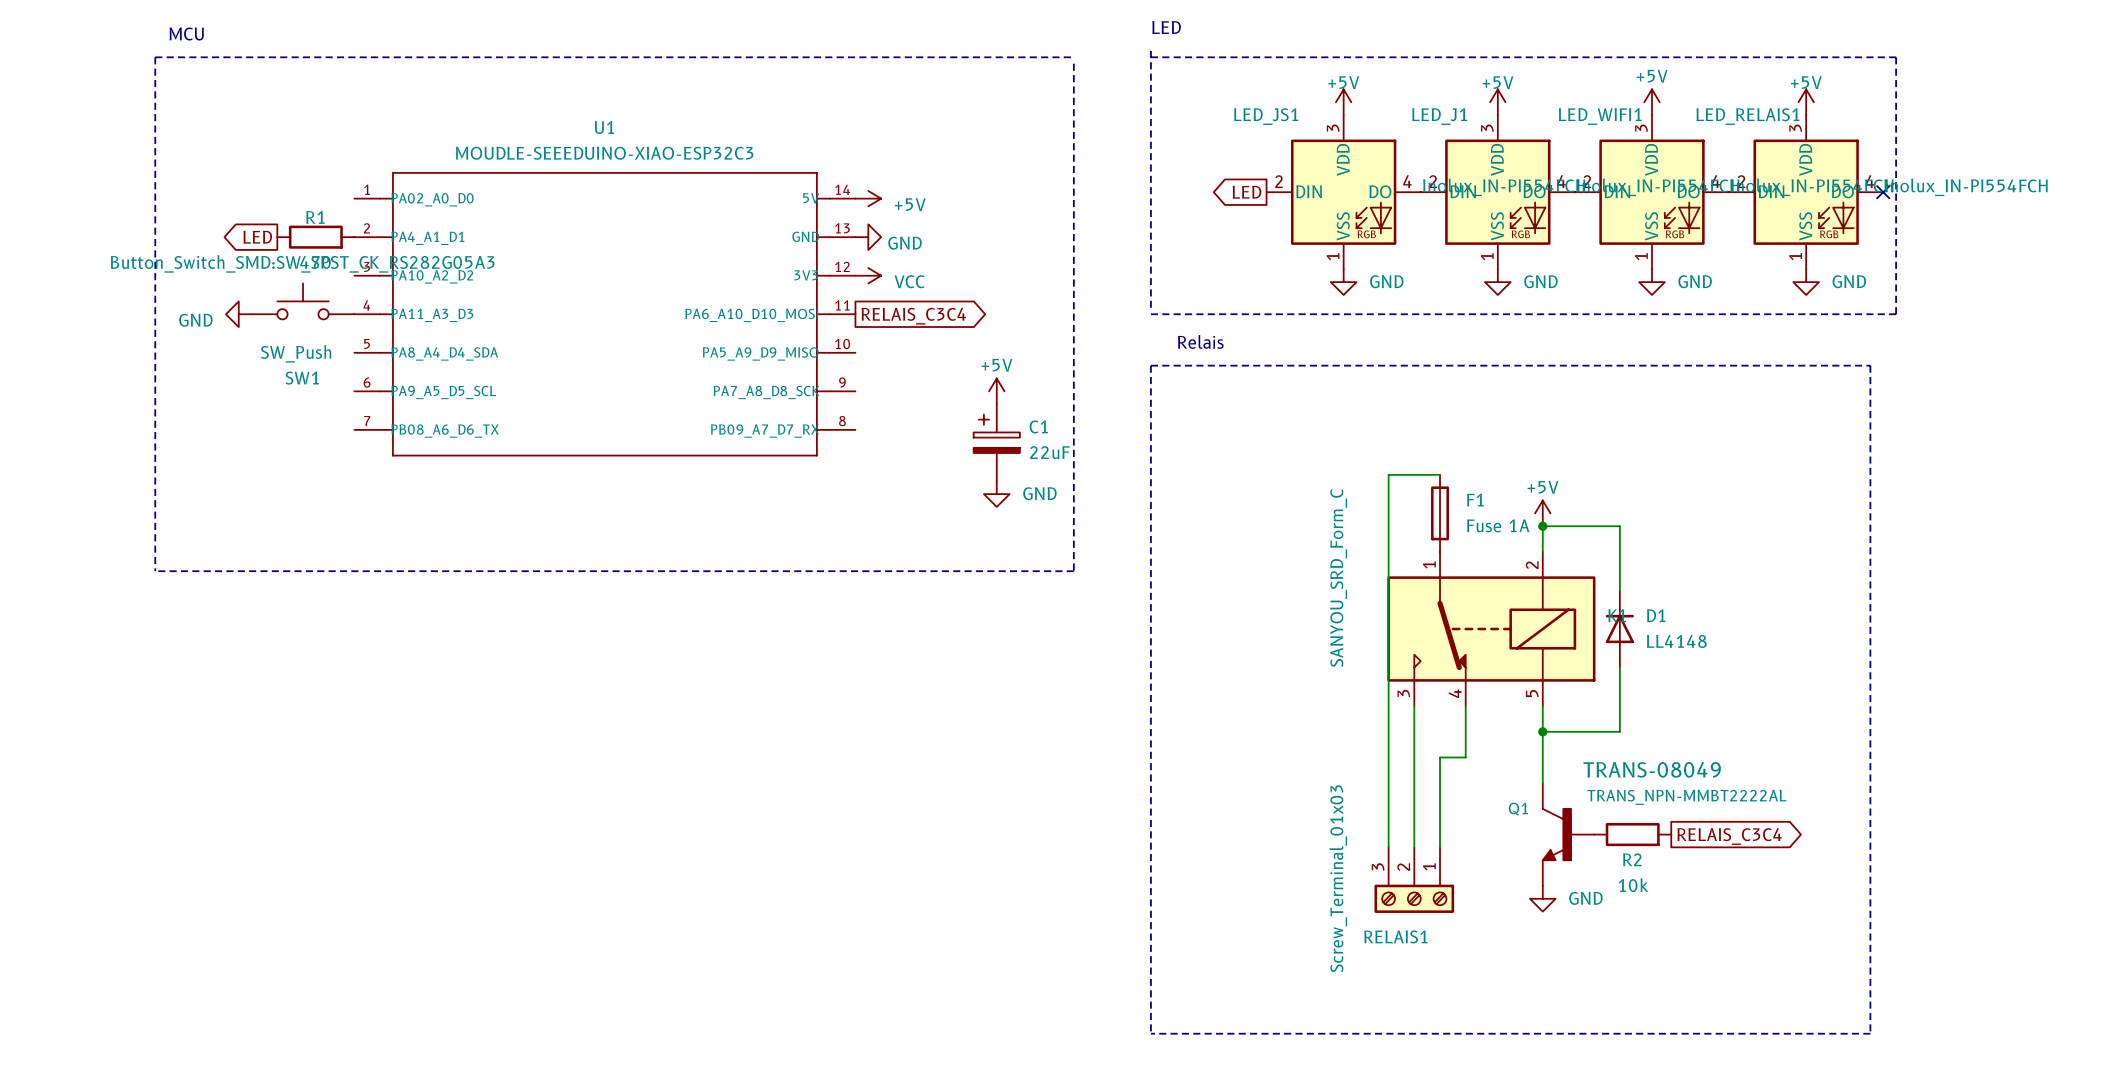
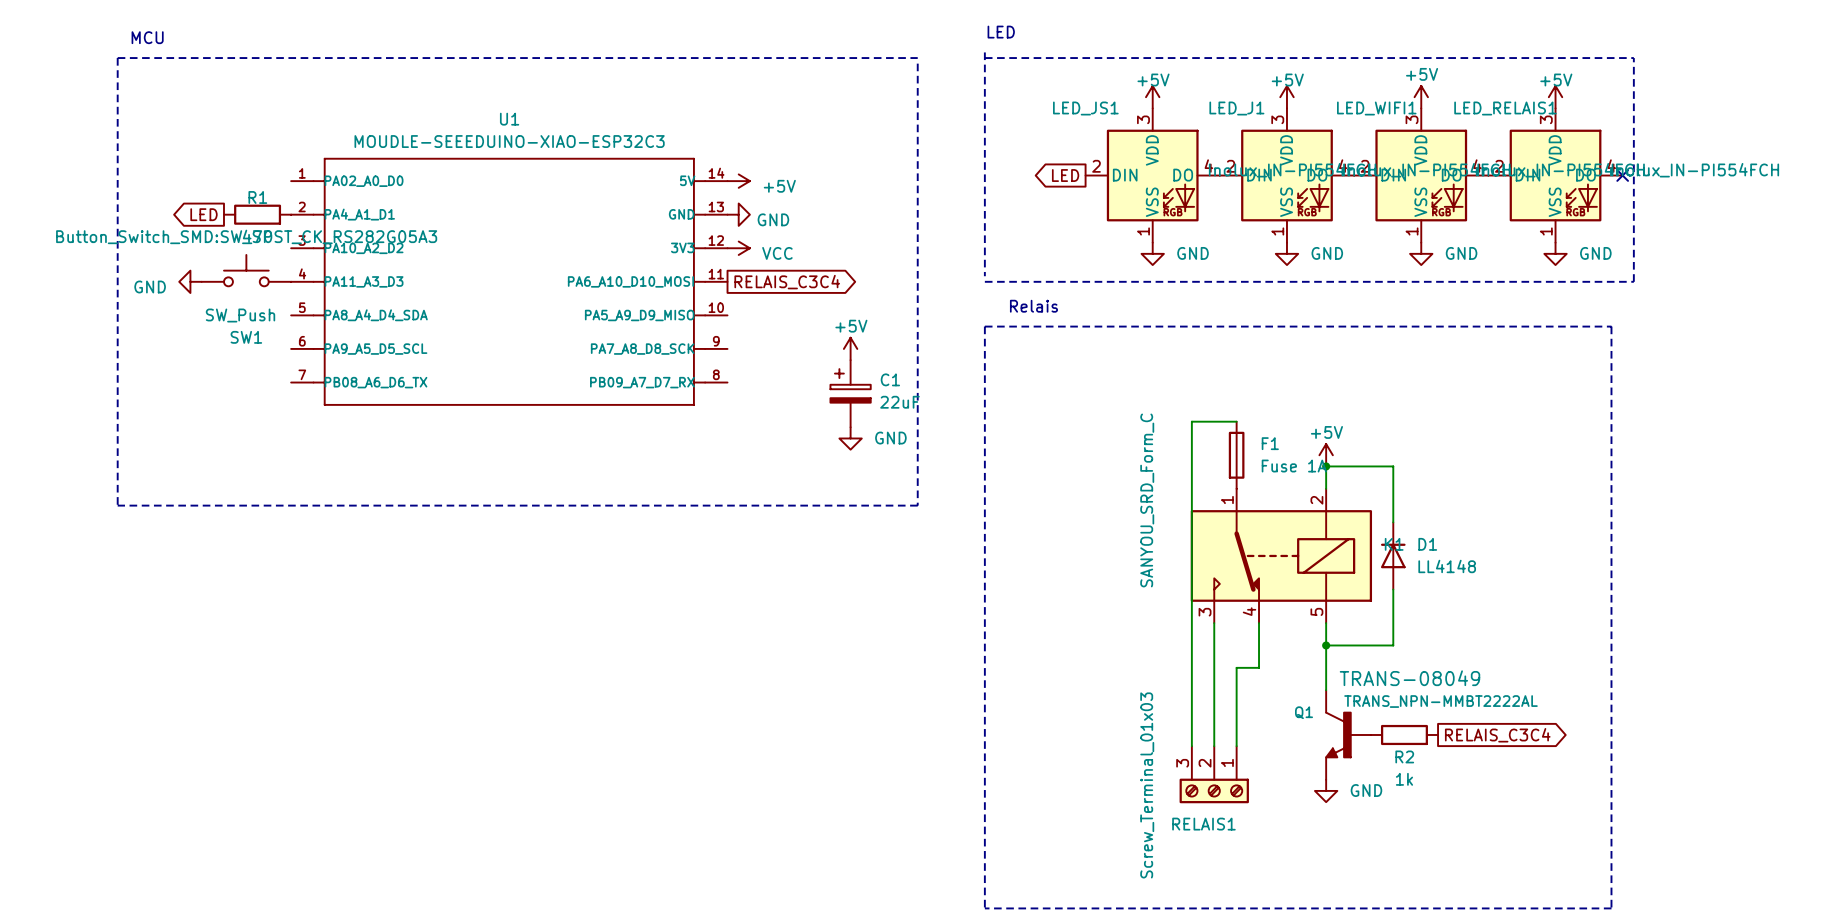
R2 value: 10k (1633, 885) -> 1k (1404, 779)

